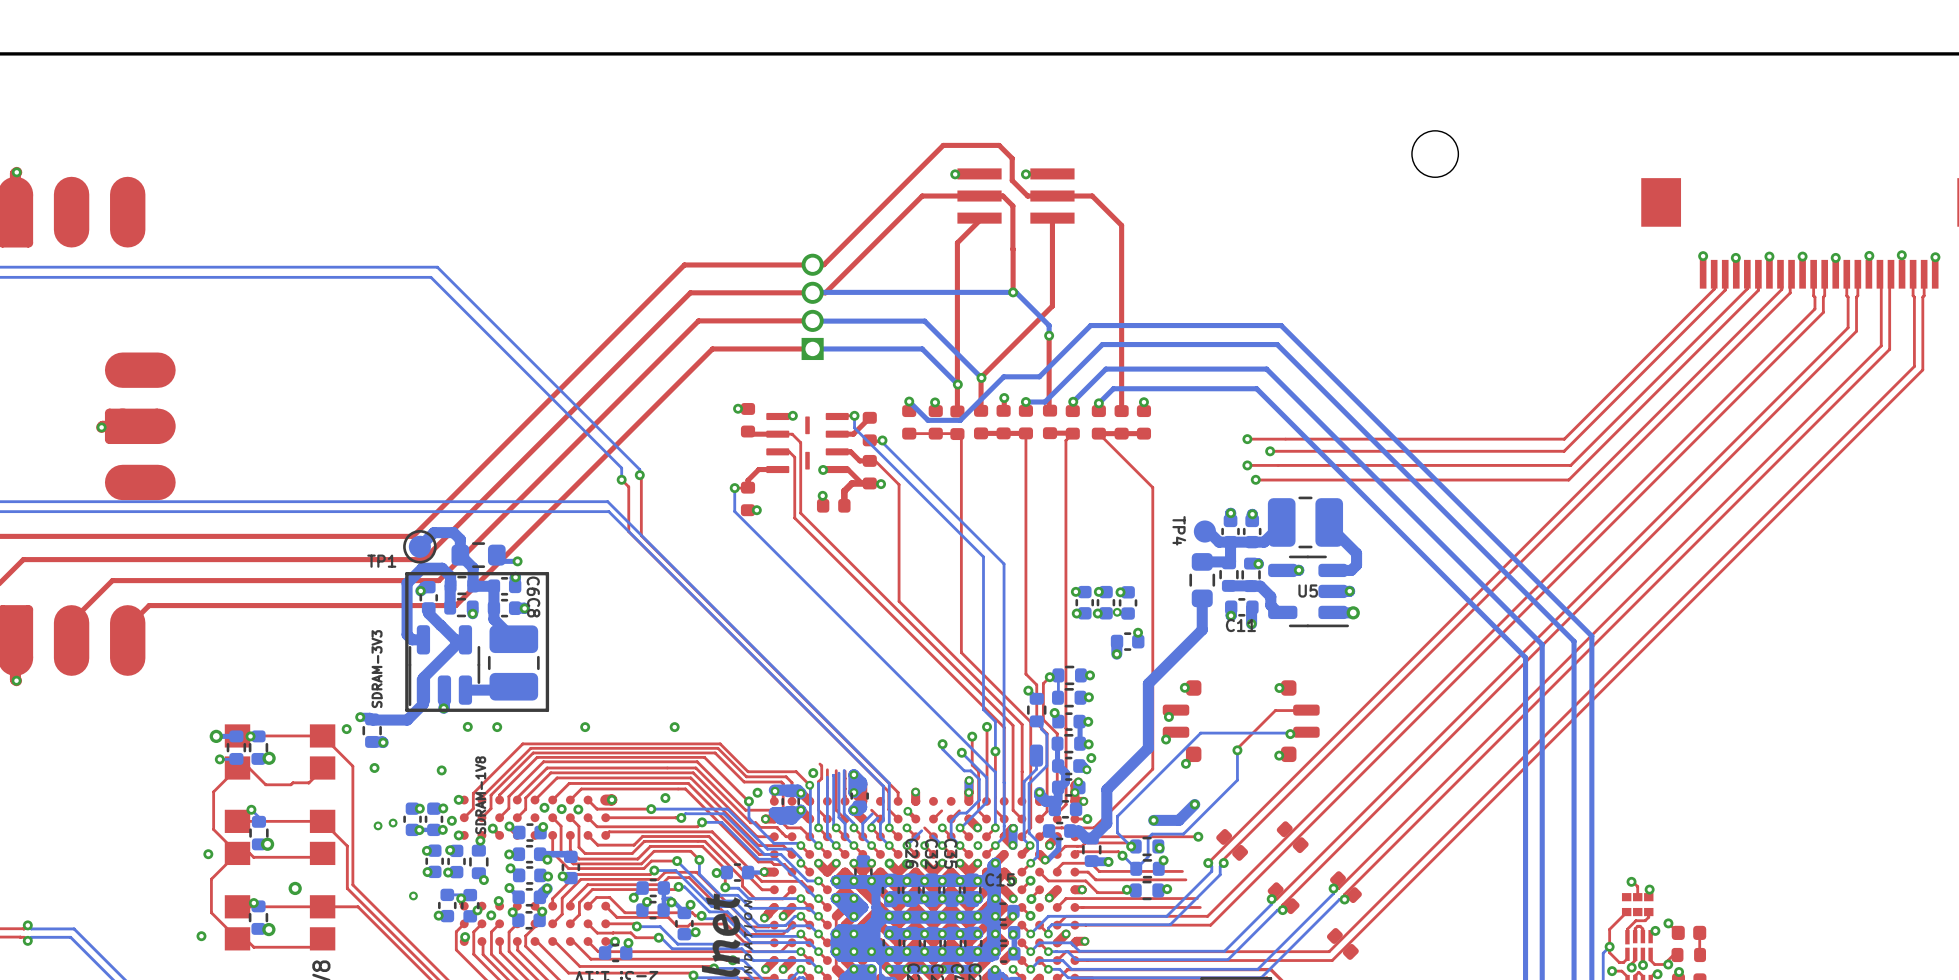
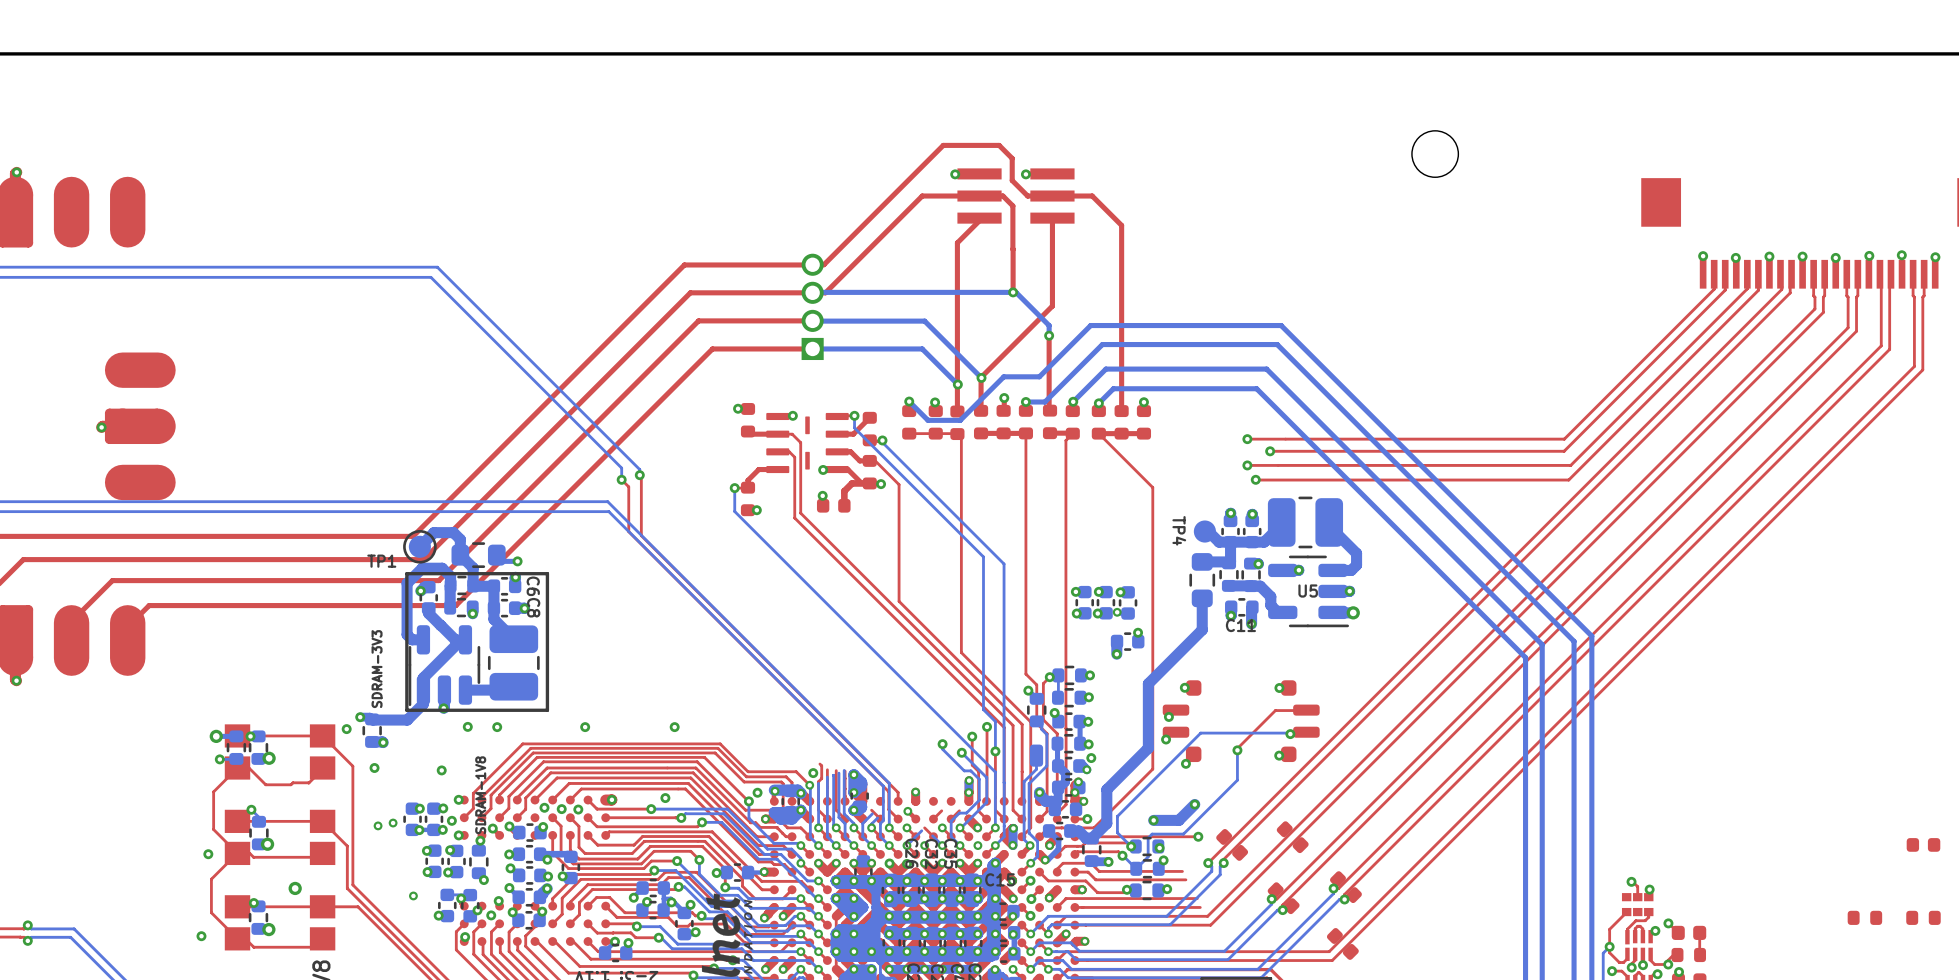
part: none -> (1923, 844)
part: none -> (1864, 917)
part: none -> (1923, 917)

